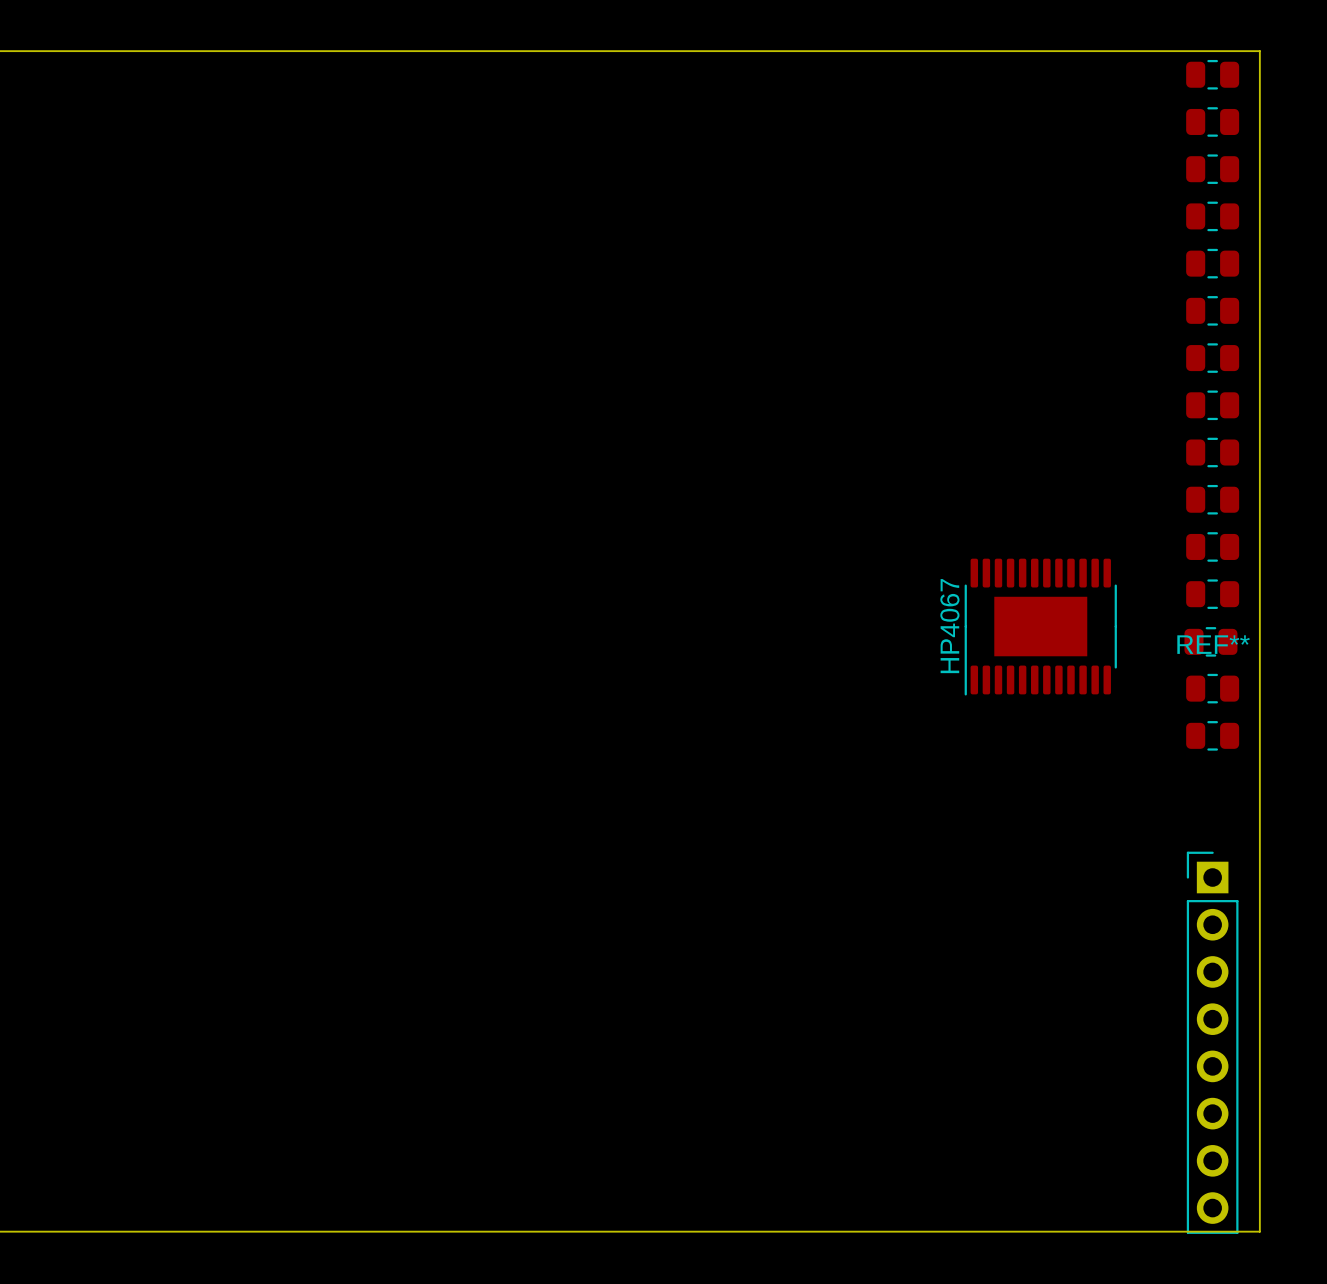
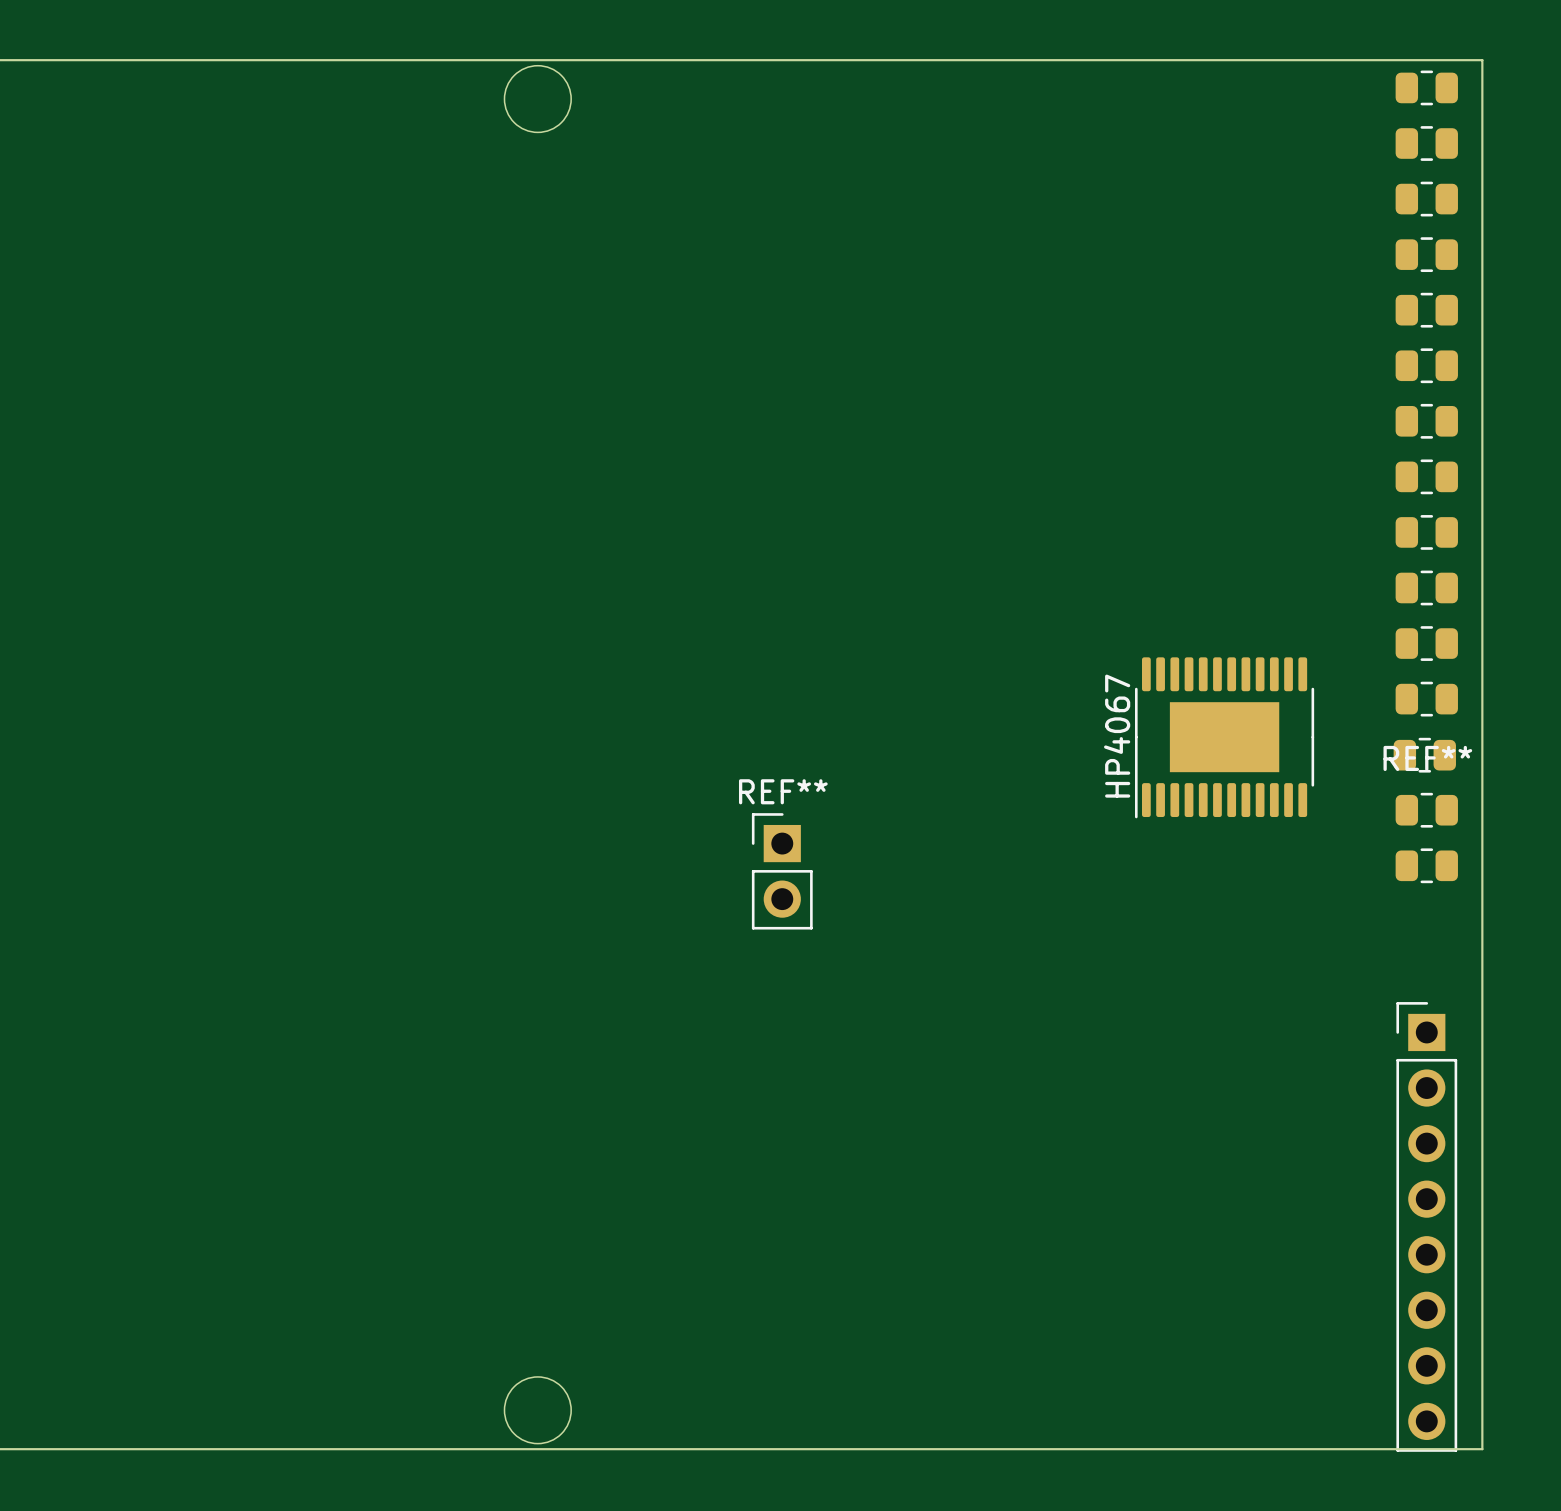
round board edge: none -> [503, 65, 572, 133]
REF**: none -> (782, 871)
round board edge: none -> [503, 1376, 572, 1445]

